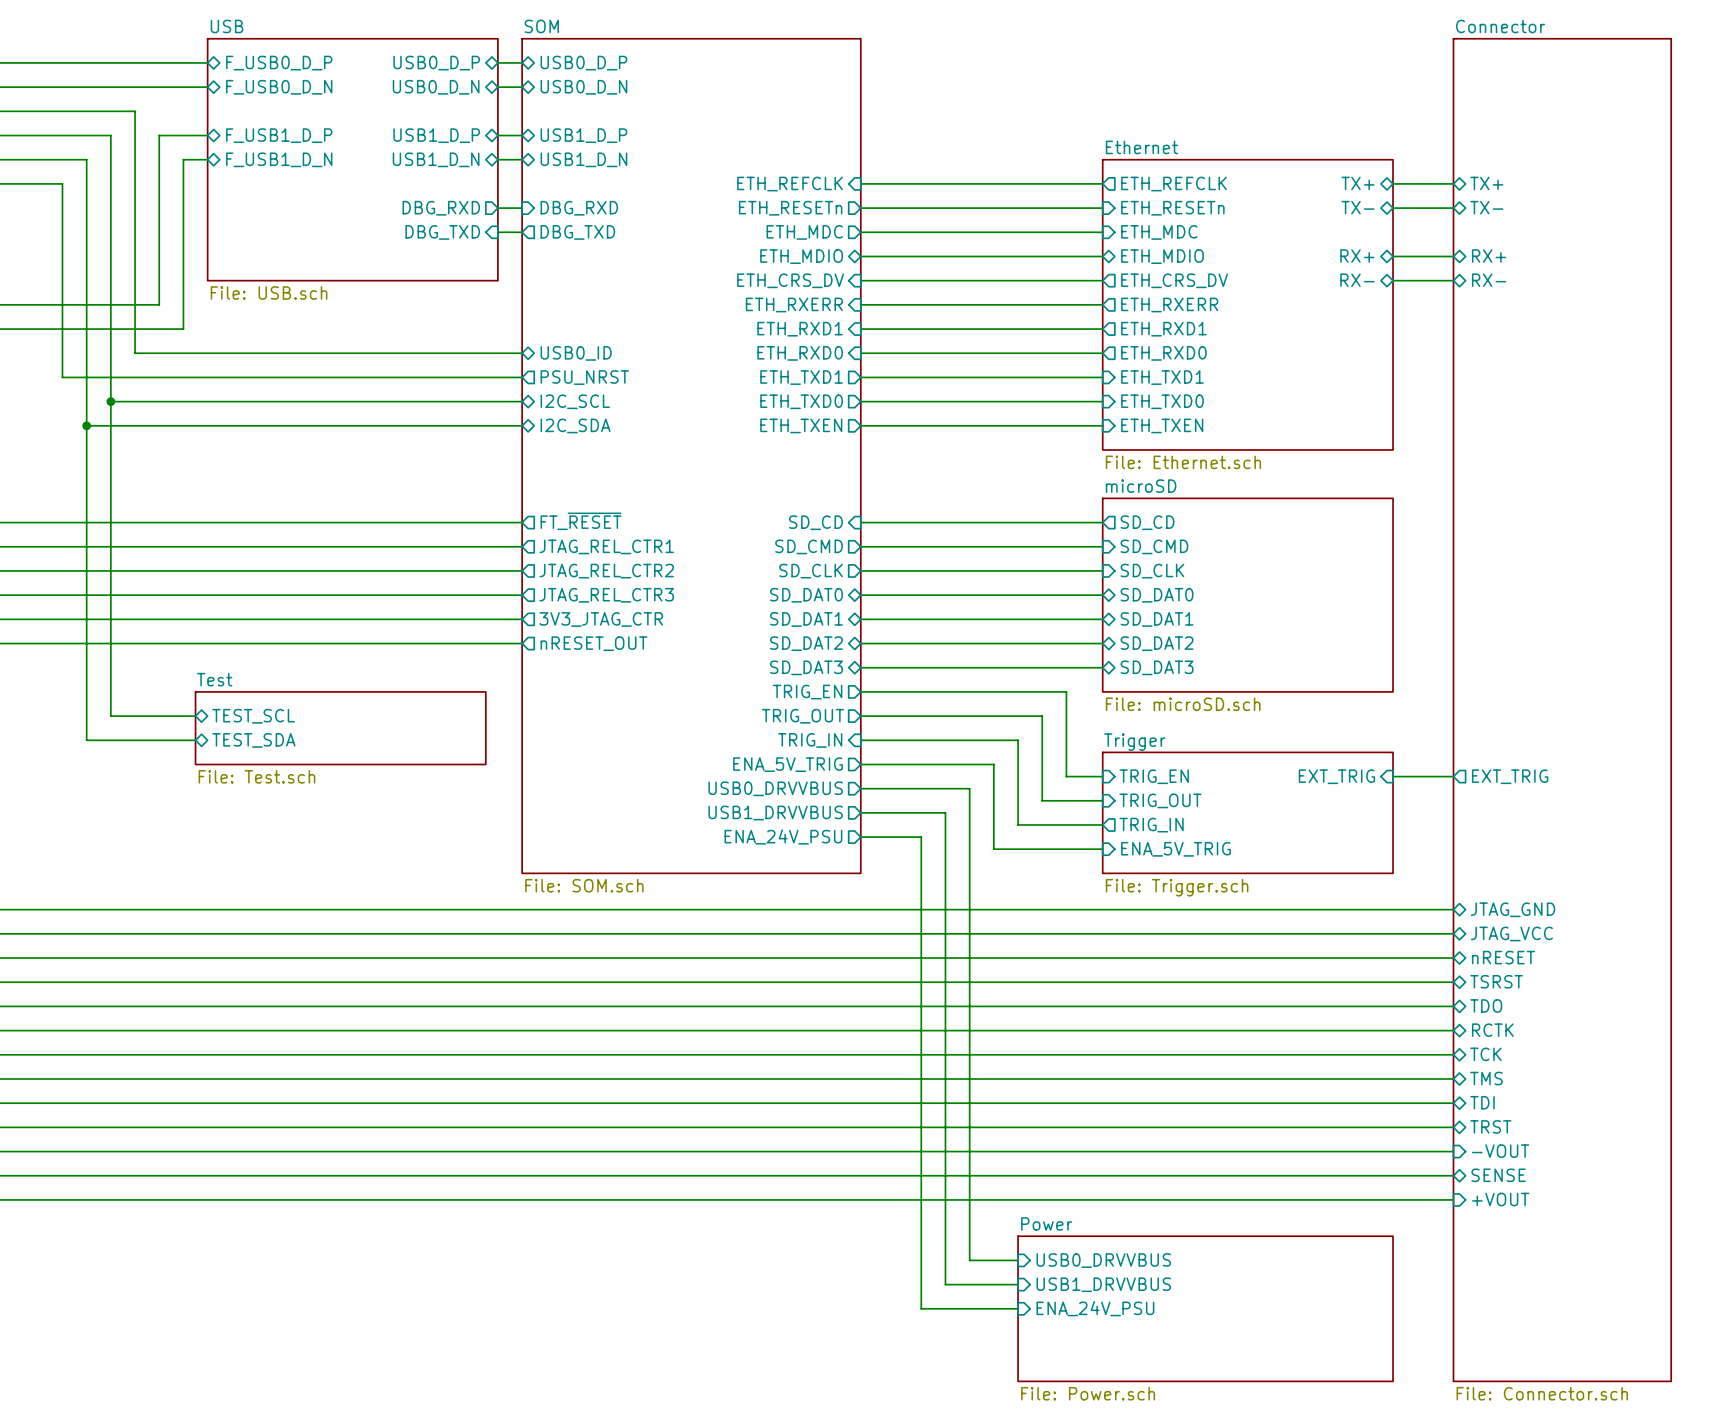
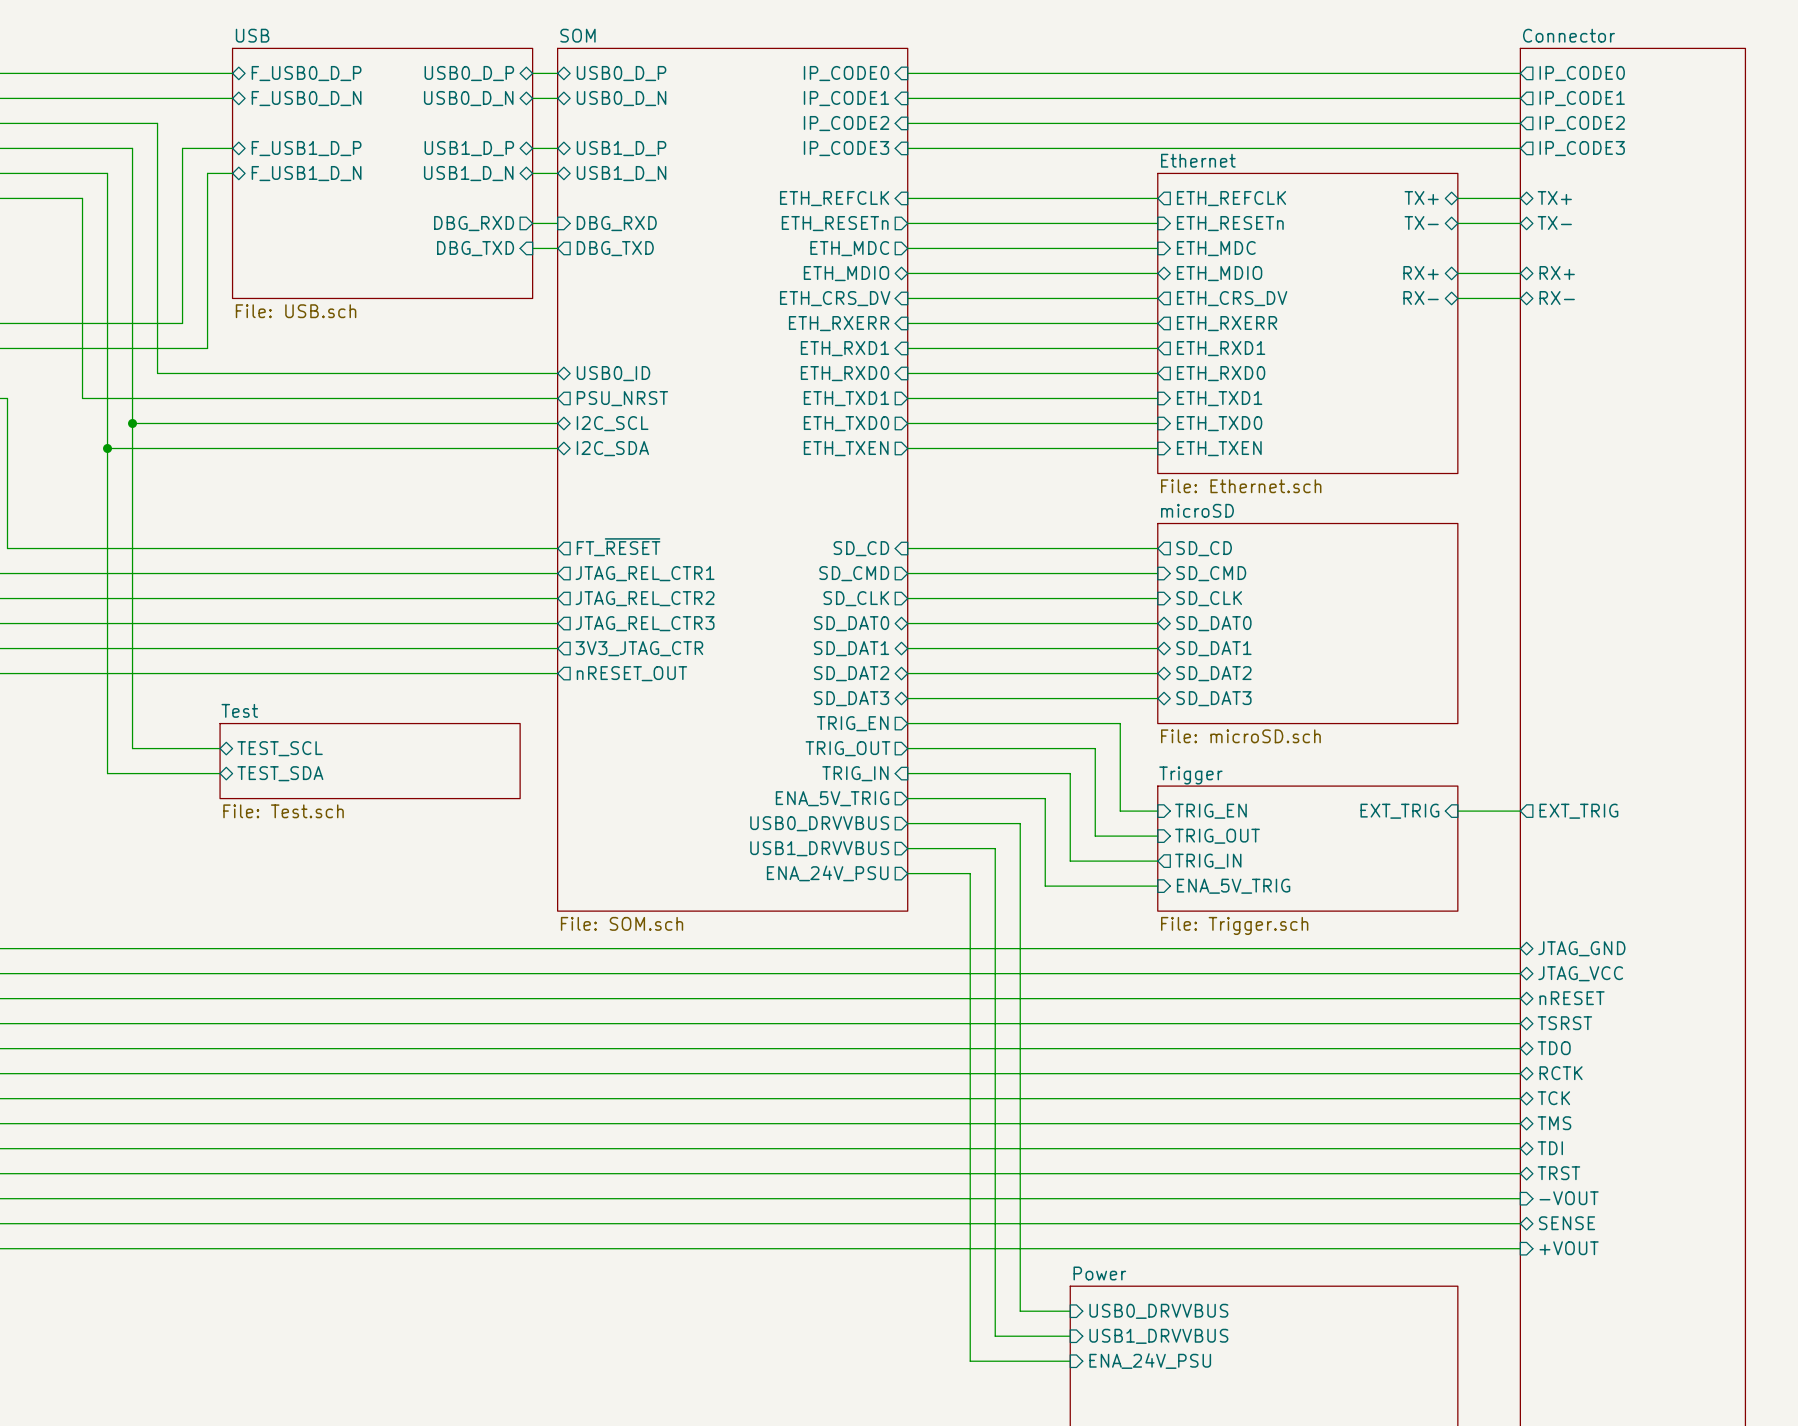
wire: none -> (907, 73) (1520, 73)
sheet pin: none -> IP_CODE0 (846, 73)
sheet pin: none -> IP_CODE0 (1582, 73)
sheet pin: none -> IP_CODE1 (846, 98)
wire: none -> (907, 98) (1520, 98)
sheet pin: none -> IP_CODE1 (1582, 98)
sheet pin: none -> IP_CODE2 (846, 123)
wire: none -> (907, 123) (1520, 123)
sheet pin: none -> IP_CODE2 (1582, 123)
sheet pin: none -> IP_CODE3 (846, 148)
wire: none -> (907, 148) (1520, 148)
sheet pin: none -> IP_CODE3 (1582, 148)

